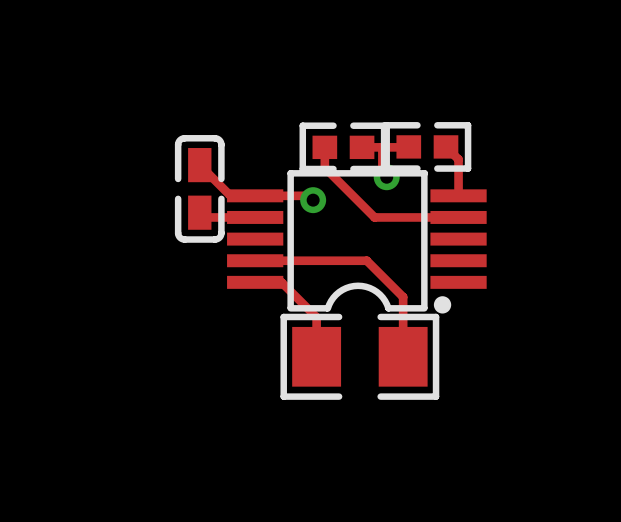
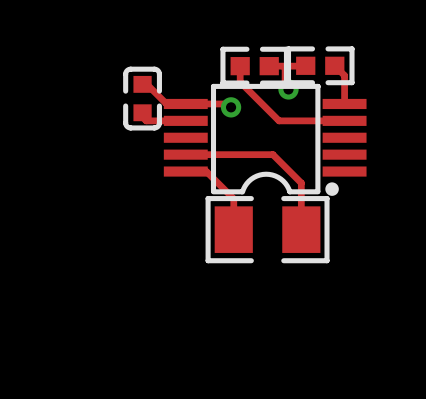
part footprint: [174, 135, 225, 243] -> [123, 66, 162, 131]

